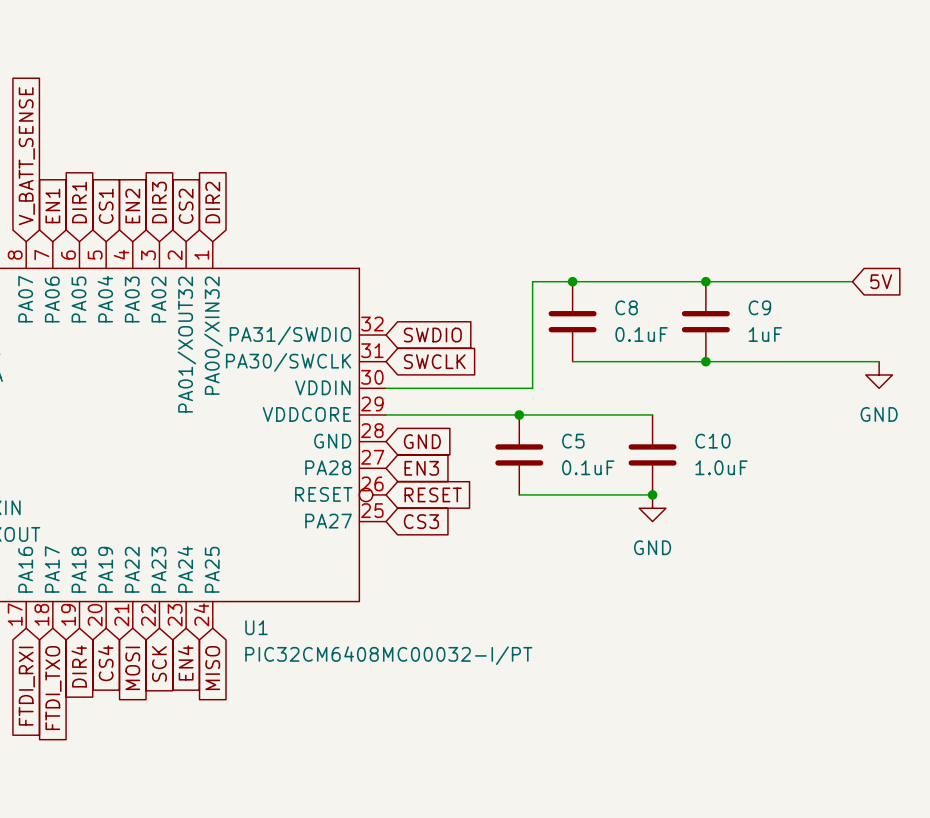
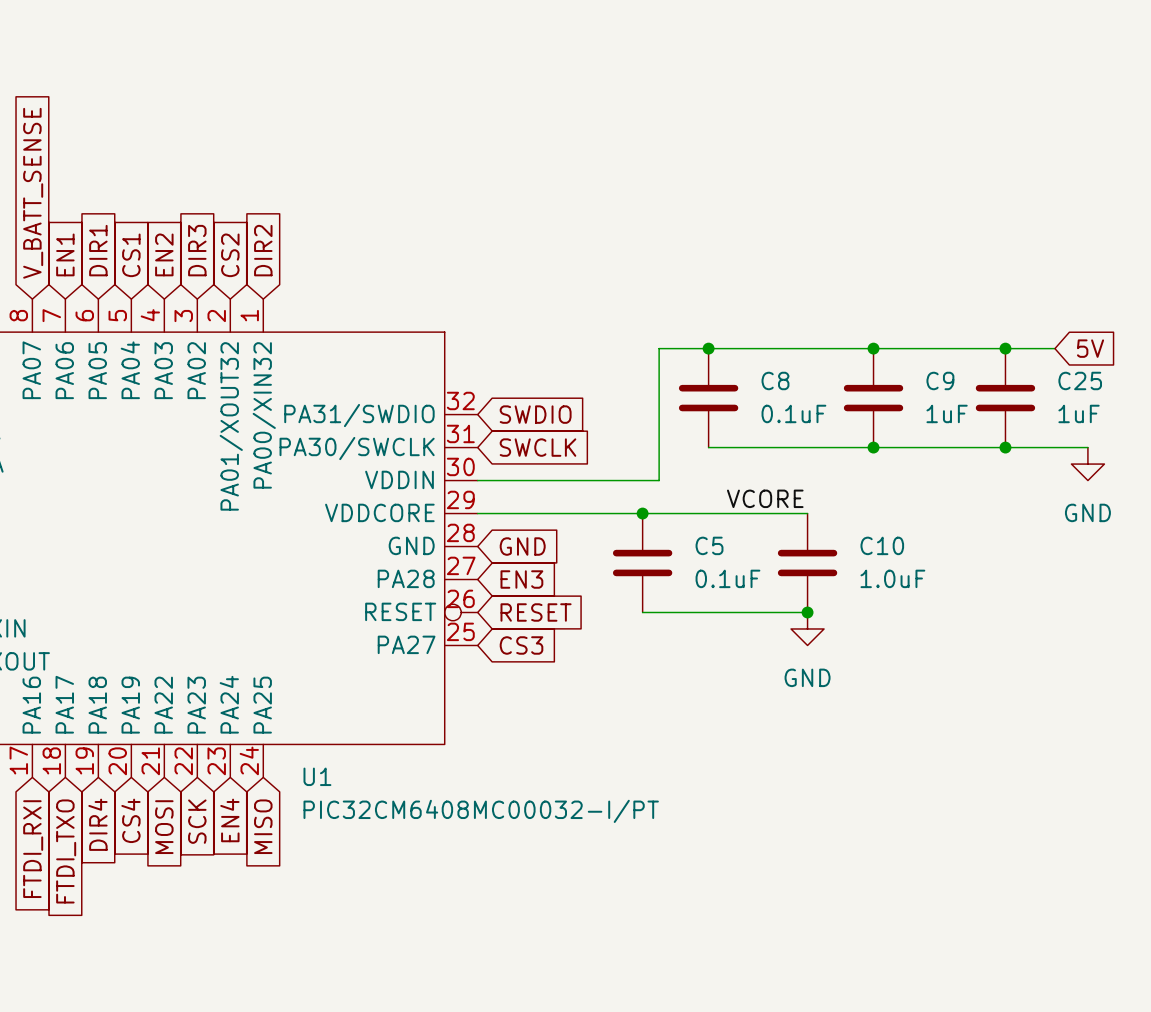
junction: none -> (1005, 348)
C25: none -> 1uF (1005, 398)
junction: none -> (1005, 447)
label: none -> VCORE (765, 498)

